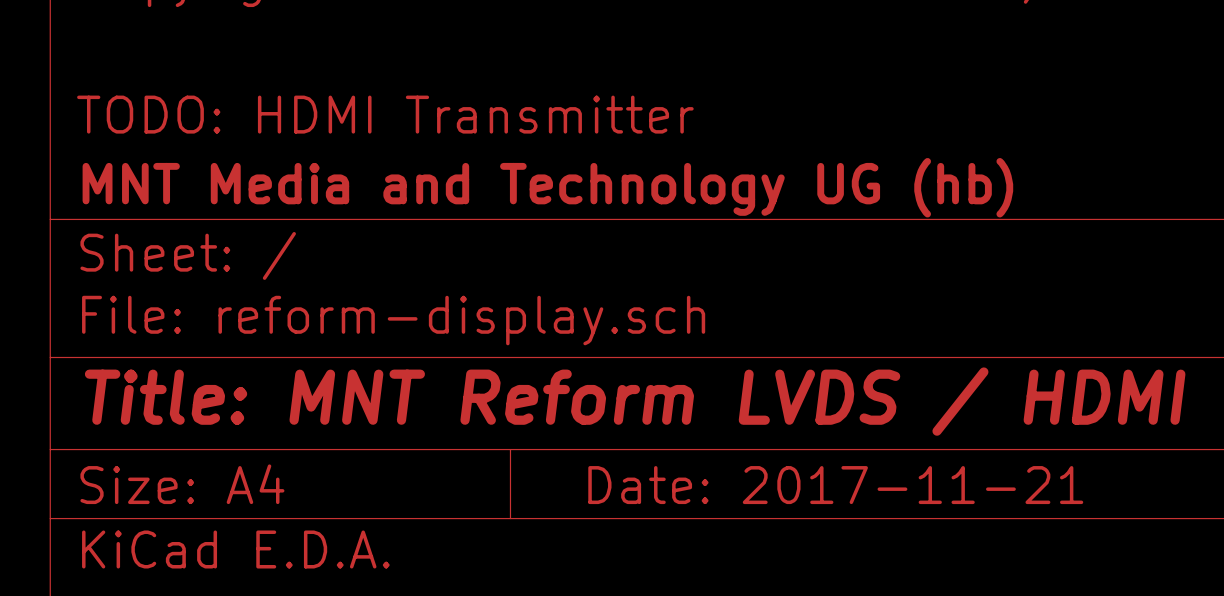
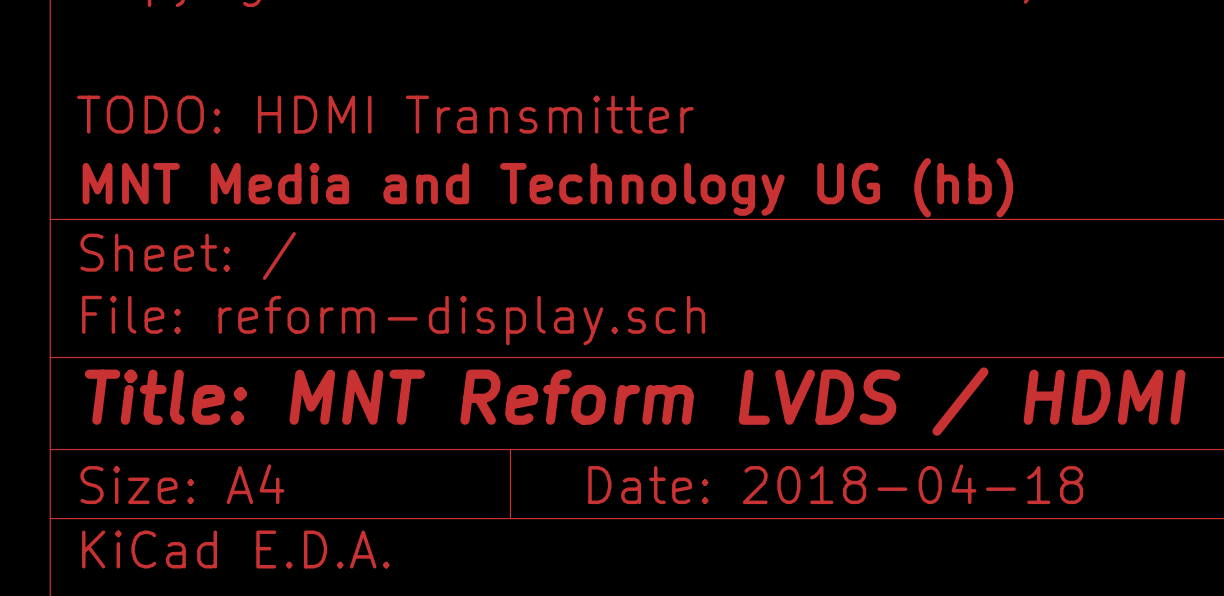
title block: Date: 2017-11-21 (835, 485) -> Date: 2018-04-18 (835, 484)

